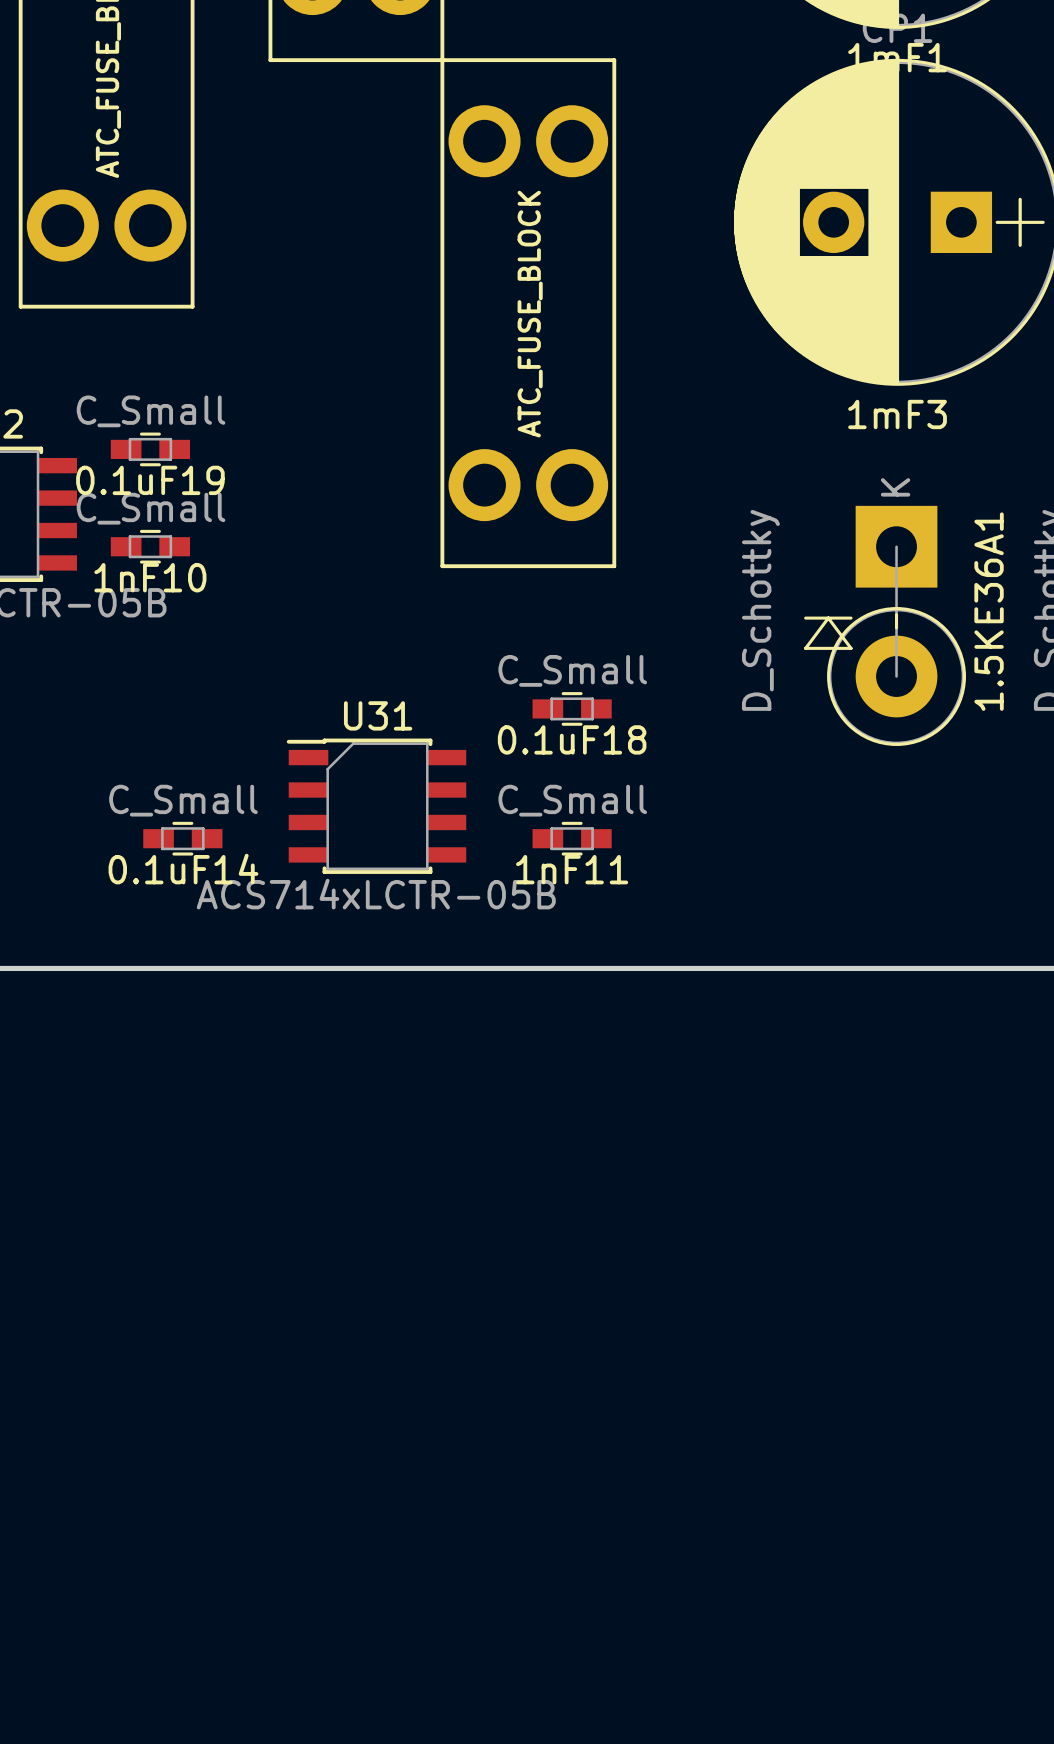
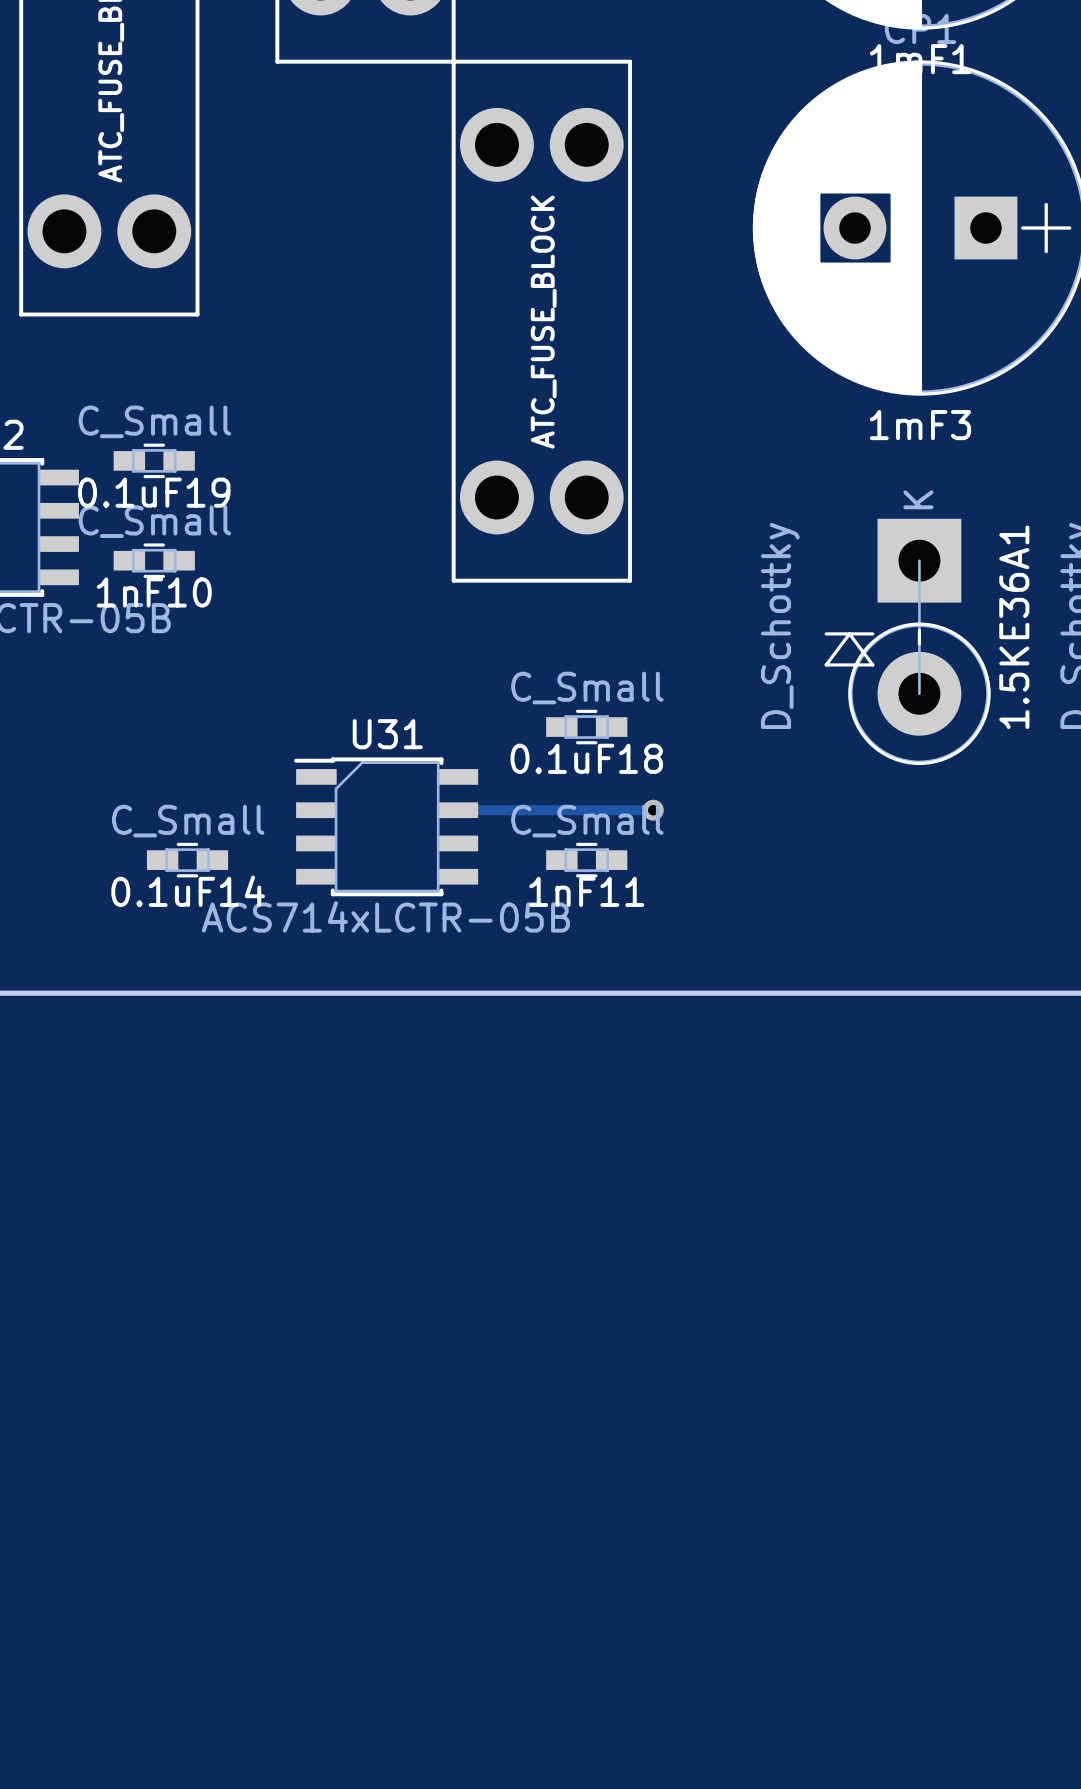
track: none -> (457, 810) (653, 810)
via: none -> (653, 810)

